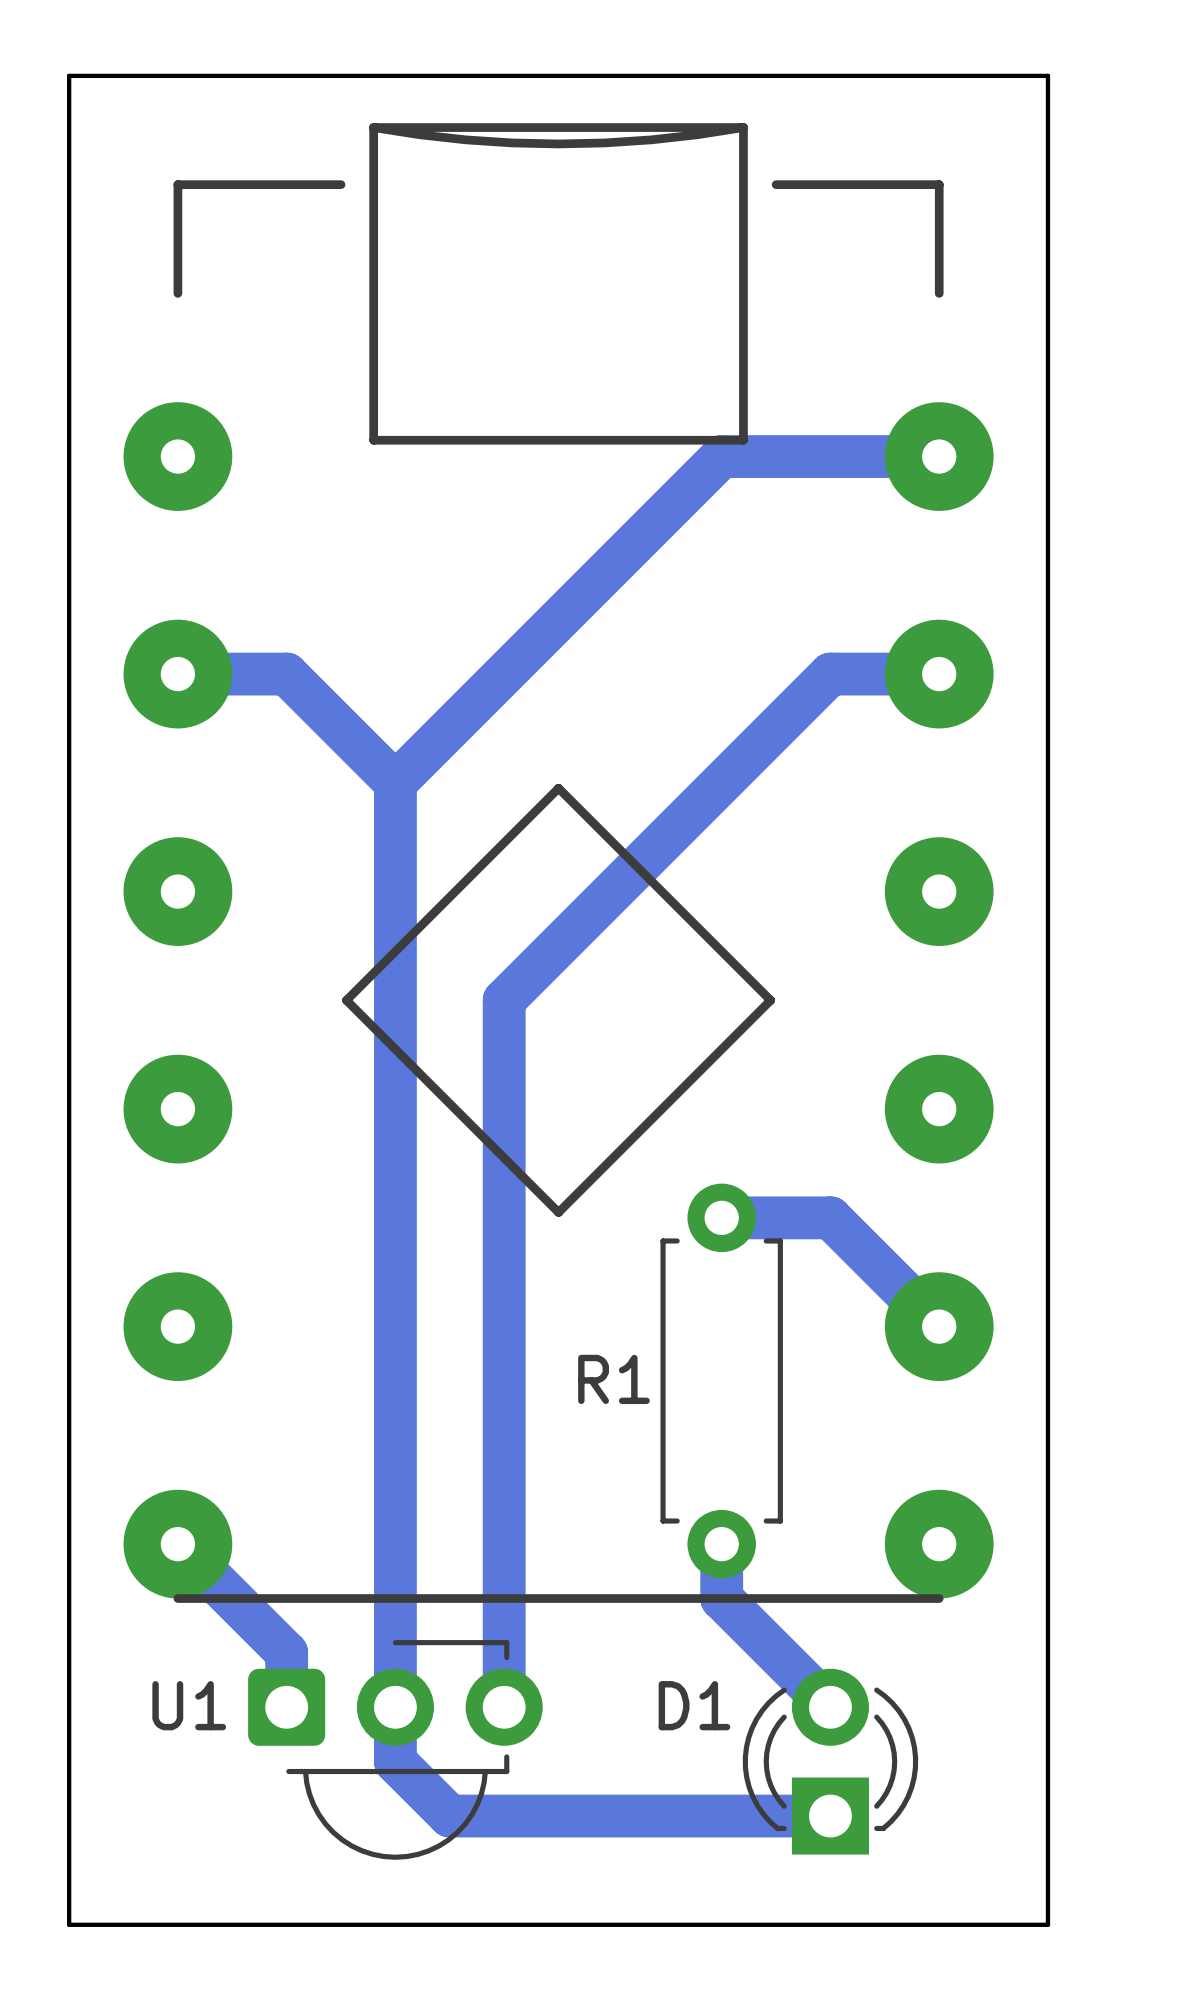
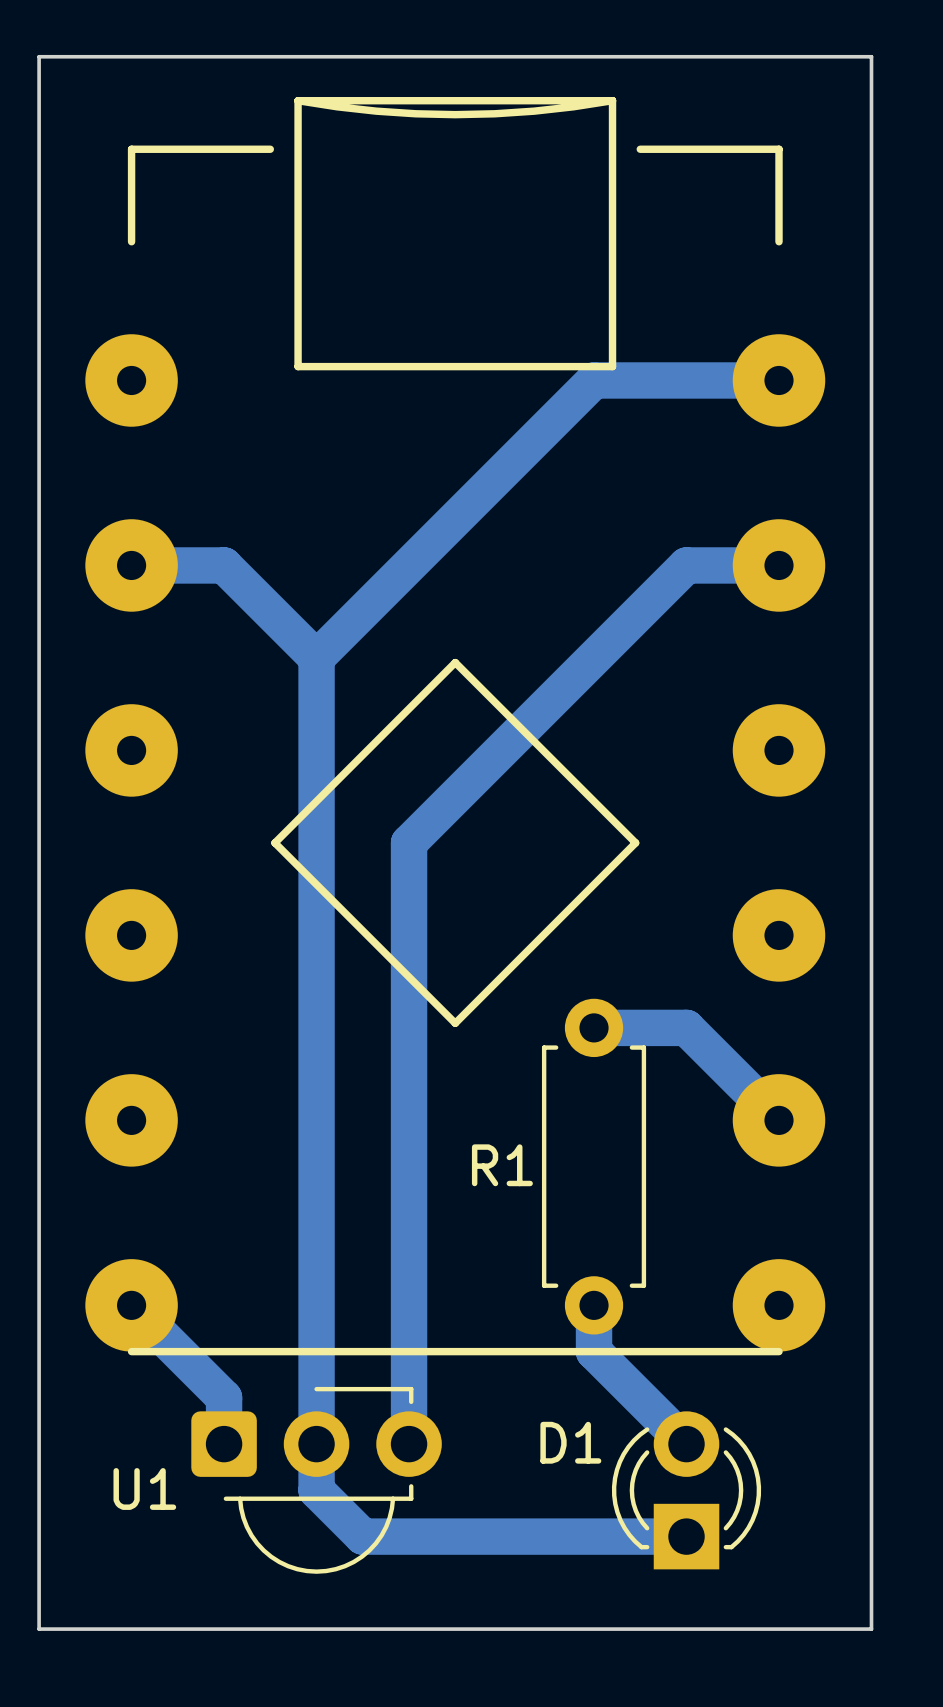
U1 name position: U1 (189, 1705) -> U1 (144, 1488)

